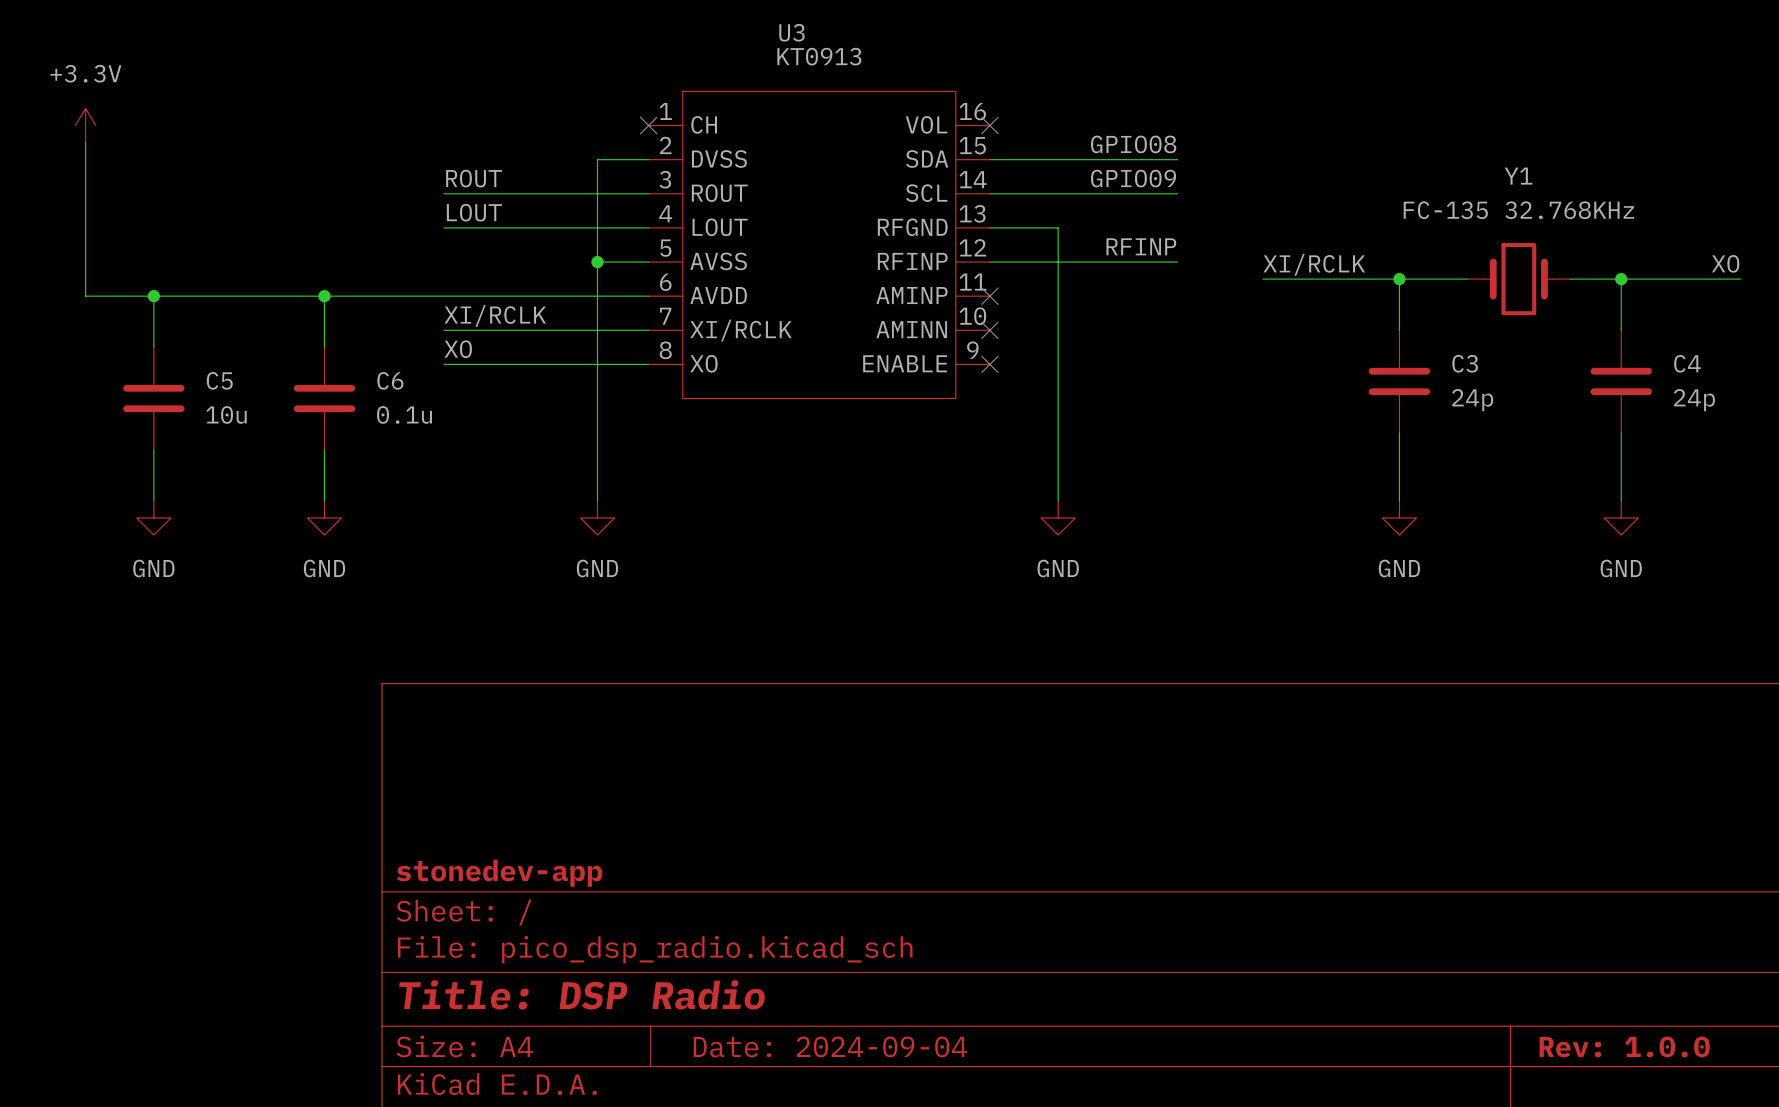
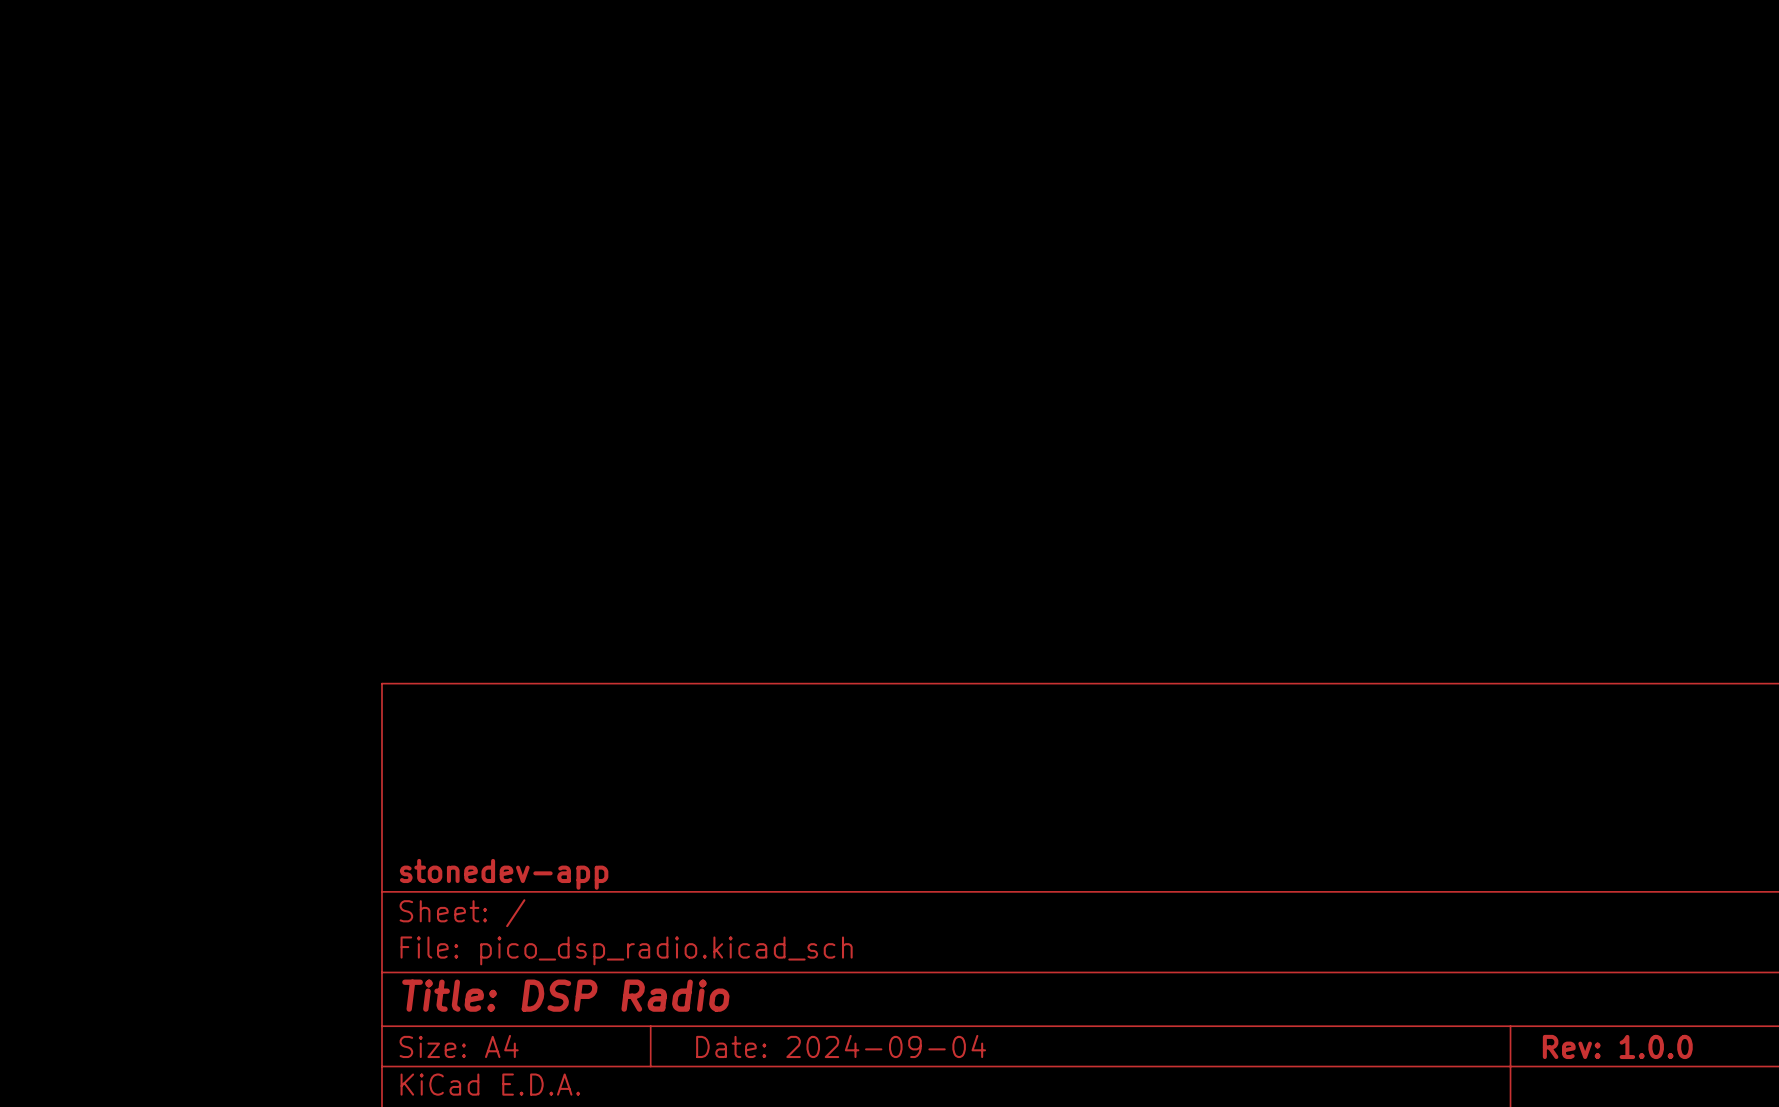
power symbol: +3.3V (85, 125) -> none
no-connect mark: (648, 125) -> none
no-connect mark: (989, 125) -> none
wire: (85, 142) (85, 296) (648, 296) -> none
label: GPIO08 (1133, 144) -> none
wire: (648, 159) (597, 159) (597, 500) -> none
wire: (989, 159) (1177, 159) -> none
label: ROUT (474, 178) -> none
label: GPIO09 (1133, 178) -> none
wire: (443, 193) (648, 193) -> none
wire: (989, 193) (1177, 193) -> none
label: LOUT (474, 212) -> none
wire: (443, 227) (648, 227) -> none
wire: (989, 227) (1058, 227) (1058, 500) -> none
U3: KT0913 (819, 244) -> none
label: RFINP (1141, 246) -> none
wire: (597, 262) (648, 262) -> none
junction: (597, 262) -> none
wire: (989, 262) (1177, 262) -> none
label: XO (1725, 263) -> none
label: XI/RCLK (1314, 264) -> none
wire: (1262, 279) (1467, 279) -> none
wire: (1399, 279) (1399, 330) -> none
junction: (1399, 279) -> none
Y1: FC-135 32.768KHz (1518, 279) -> none
wire: (1570, 279) (1740, 279) -> none
wire: (1621, 279) (1621, 330) -> none
junction: (1621, 279) -> none
wire: (153, 296) (153, 347) -> none
junction: (153, 296) -> none
wire: (324, 296) (324, 347) -> none
junction: (324, 296) -> none
no-connect mark: (989, 296) -> none
label: XI/RCLK (495, 315) -> none
wire: (443, 330) (648, 330) -> none
no-connect mark: (989, 330) -> none
label: XO (458, 349) -> none
wire: (443, 364) (648, 364) -> none
no-connect mark: (989, 364) -> none
C3: 24p (1399, 381) -> none
C4: 24p (1621, 381) -> none
C5: 10u (153, 398) -> none
C6: 0.1u (324, 398) -> none
wire: (1399, 432) (1399, 500) -> none
wire: (1621, 432) (1621, 500) -> none
wire: (153, 449) (153, 500) -> none
wire: (324, 449) (324, 500) -> none
power symbol: GND (153, 517) -> none
power symbol: GND (324, 517) -> none
power symbol: GND (597, 517) -> none
power symbol: GND (1058, 517) -> none
power symbol: GND (1399, 517) -> none
power symbol: GND (1621, 517) -> none

